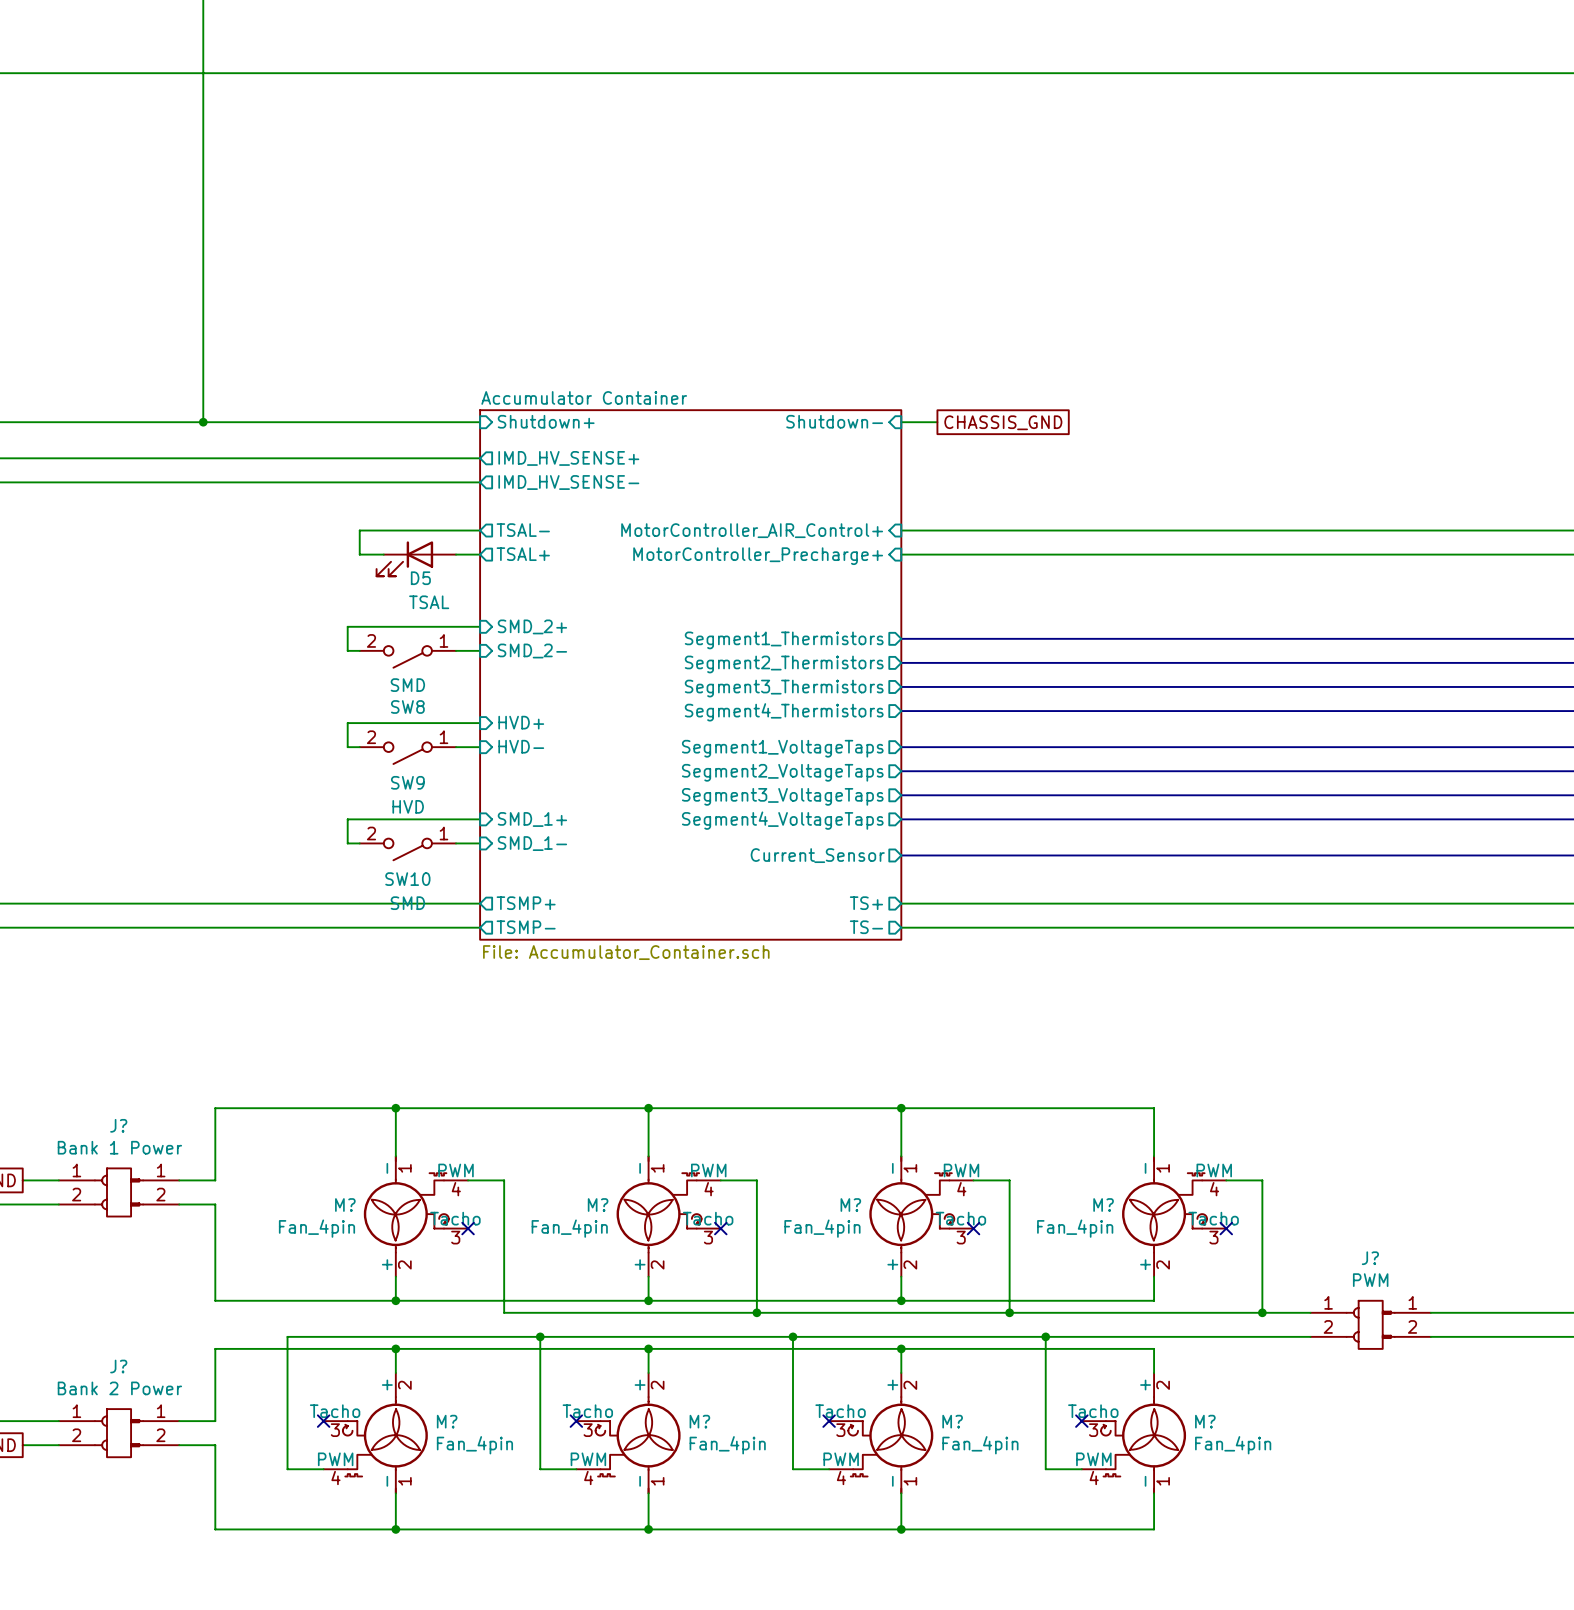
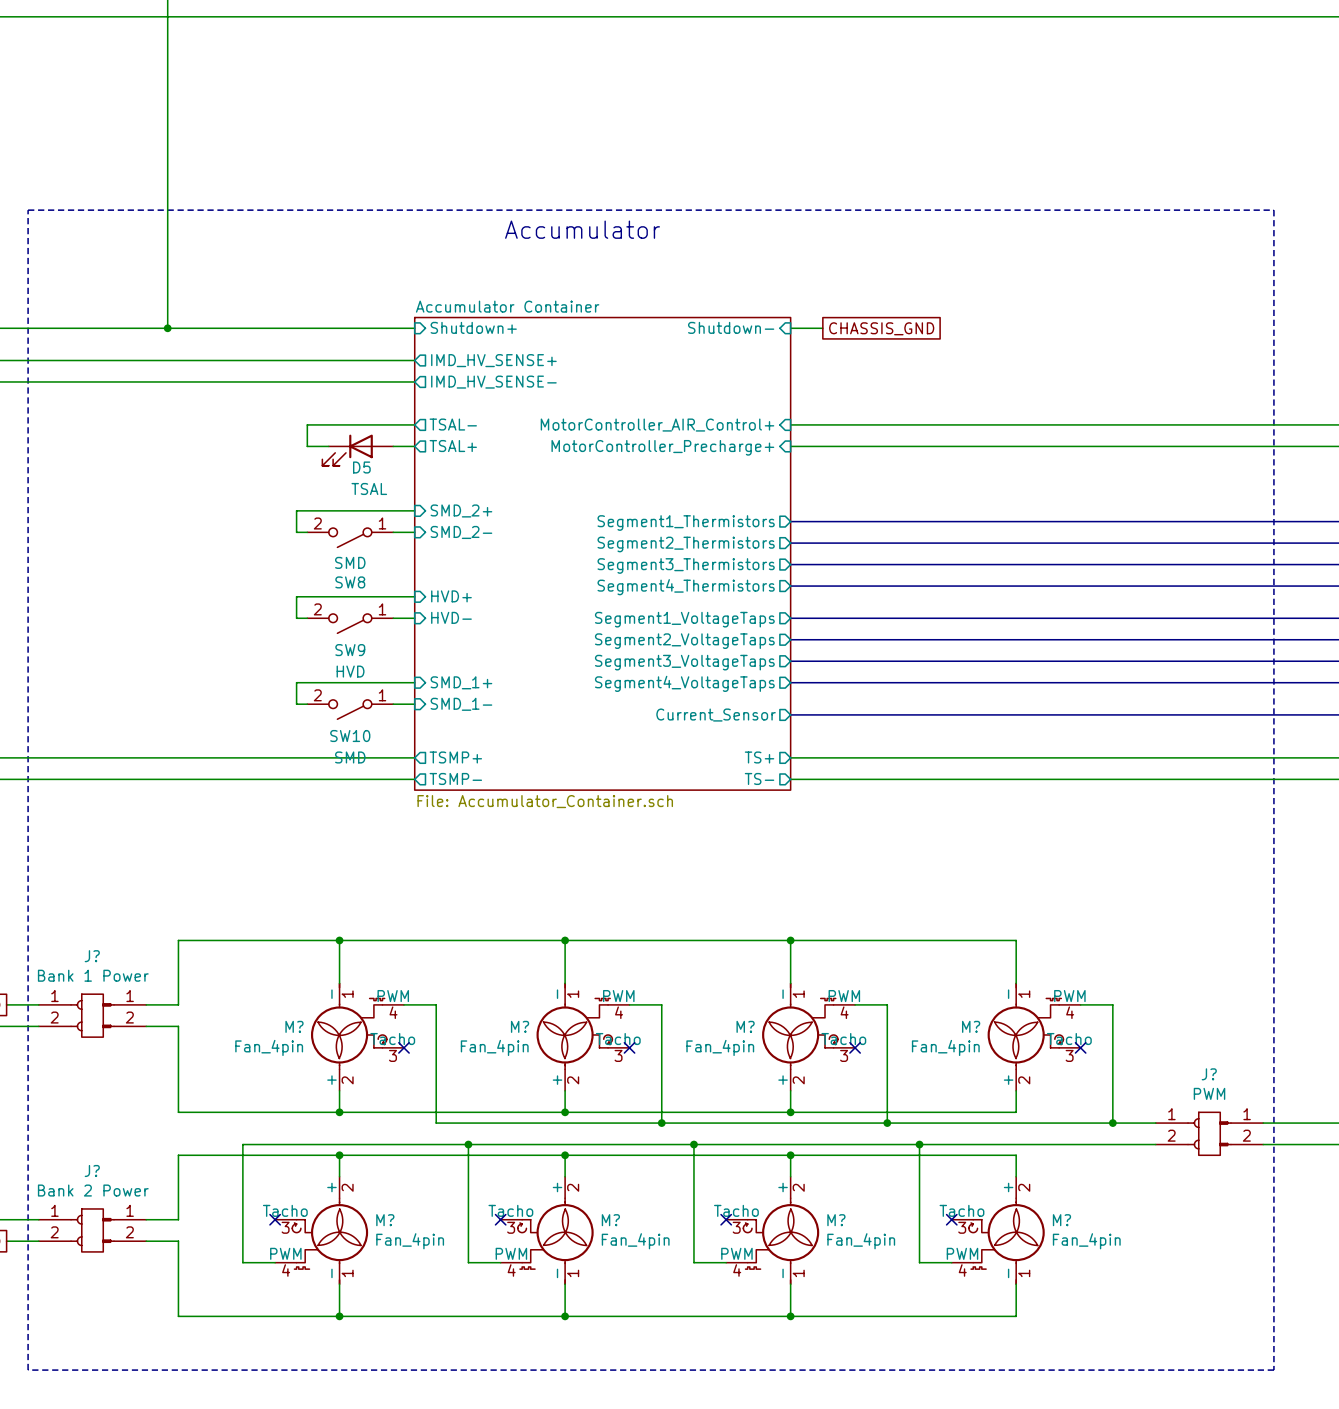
line: none -> (28, 210) (28, 1370) (1273, 1370) (1273, 210) (28, 210)
text: none -> Accumulator (582, 229)

